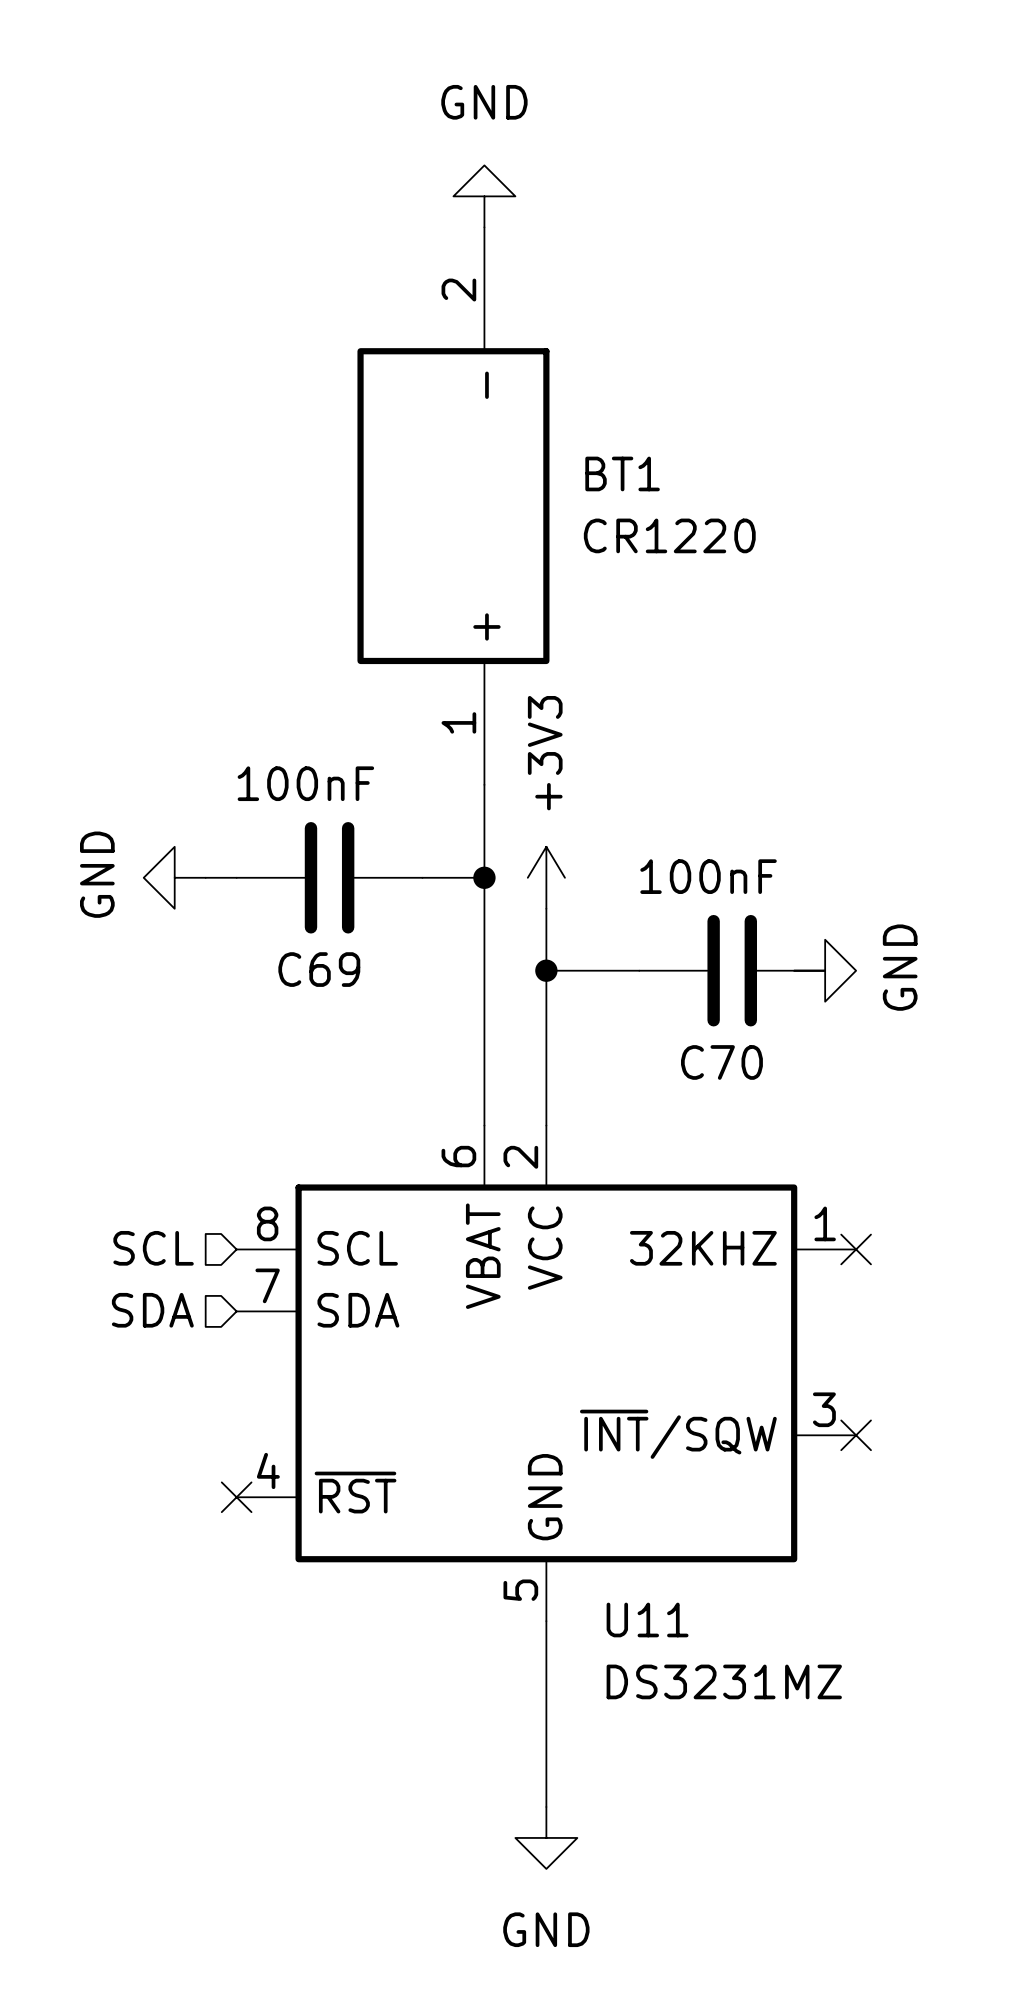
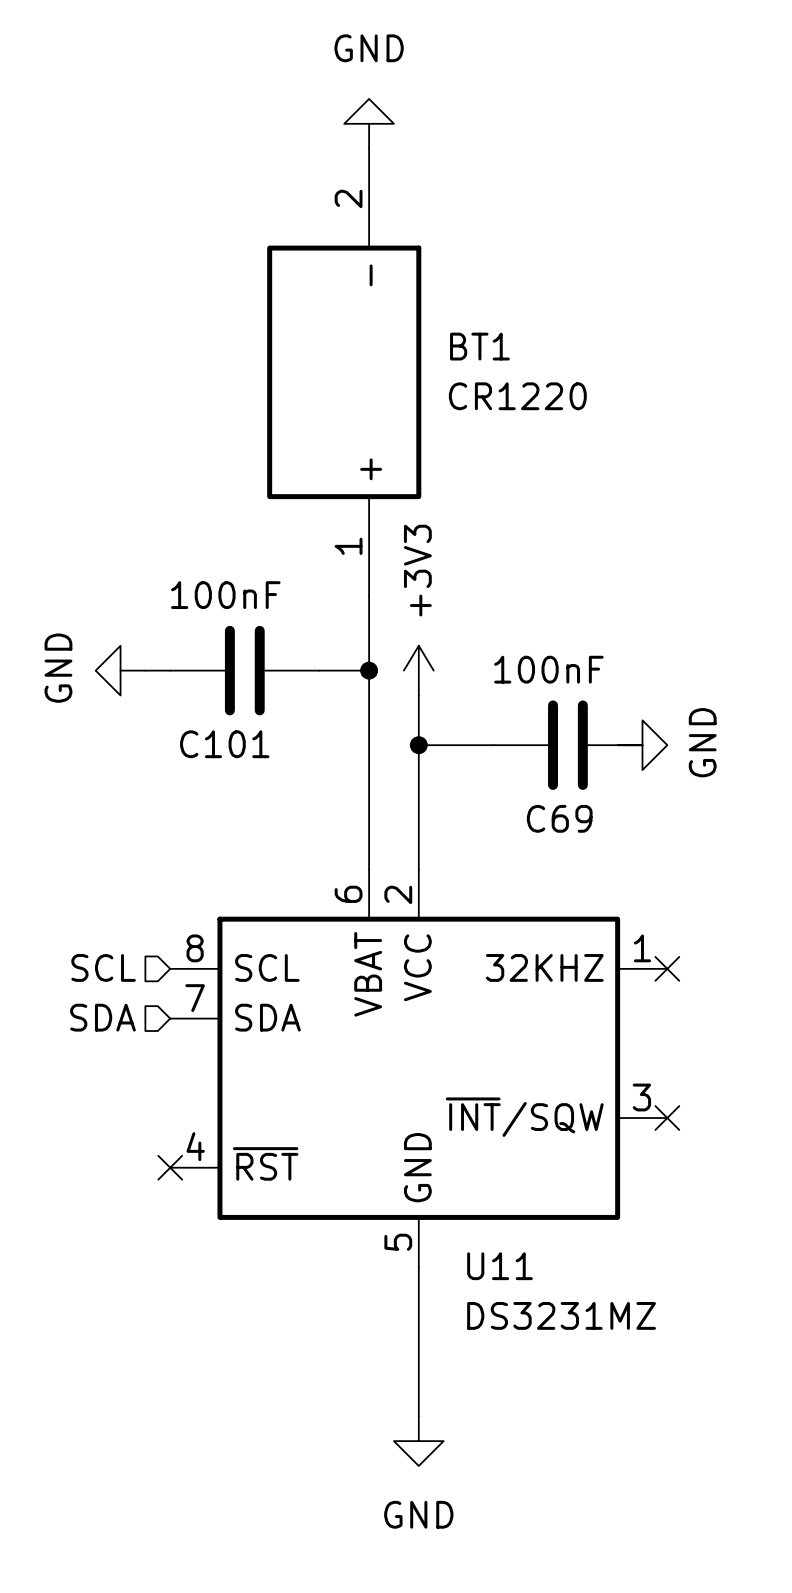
C69 name: C69 (319, 969) -> C101 (224, 744)
C70 name: C70 (721, 1062) -> C69 (559, 818)

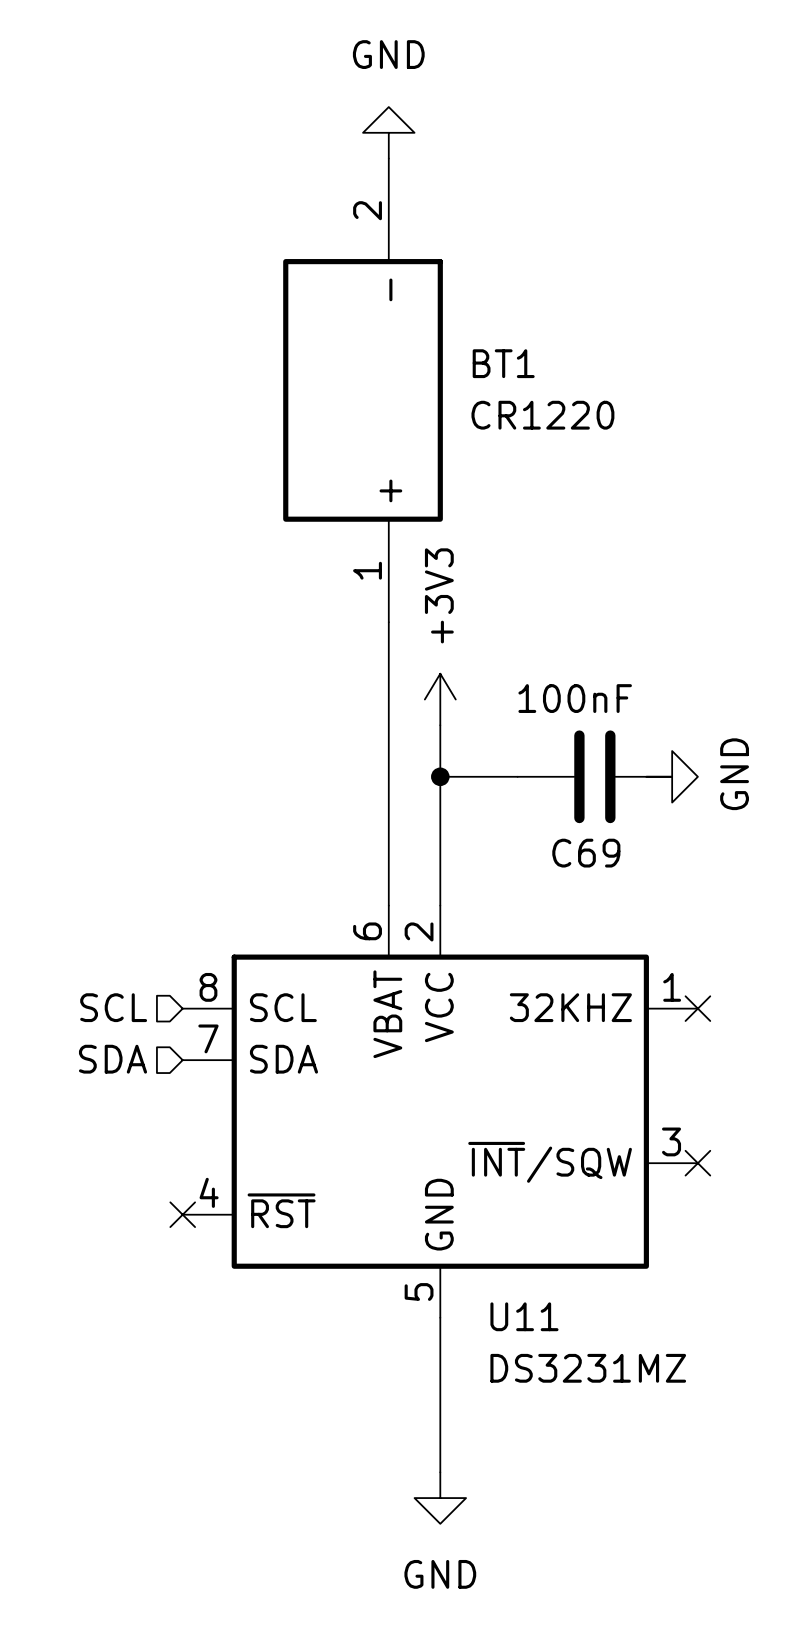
power symbol: GND (120, 670) -> none
wire: (145, 670) (170, 670) -> none
C101: 100nF (244, 670) -> none
wire: (319, 670) (369, 670) -> none
junction: (369, 670) -> none

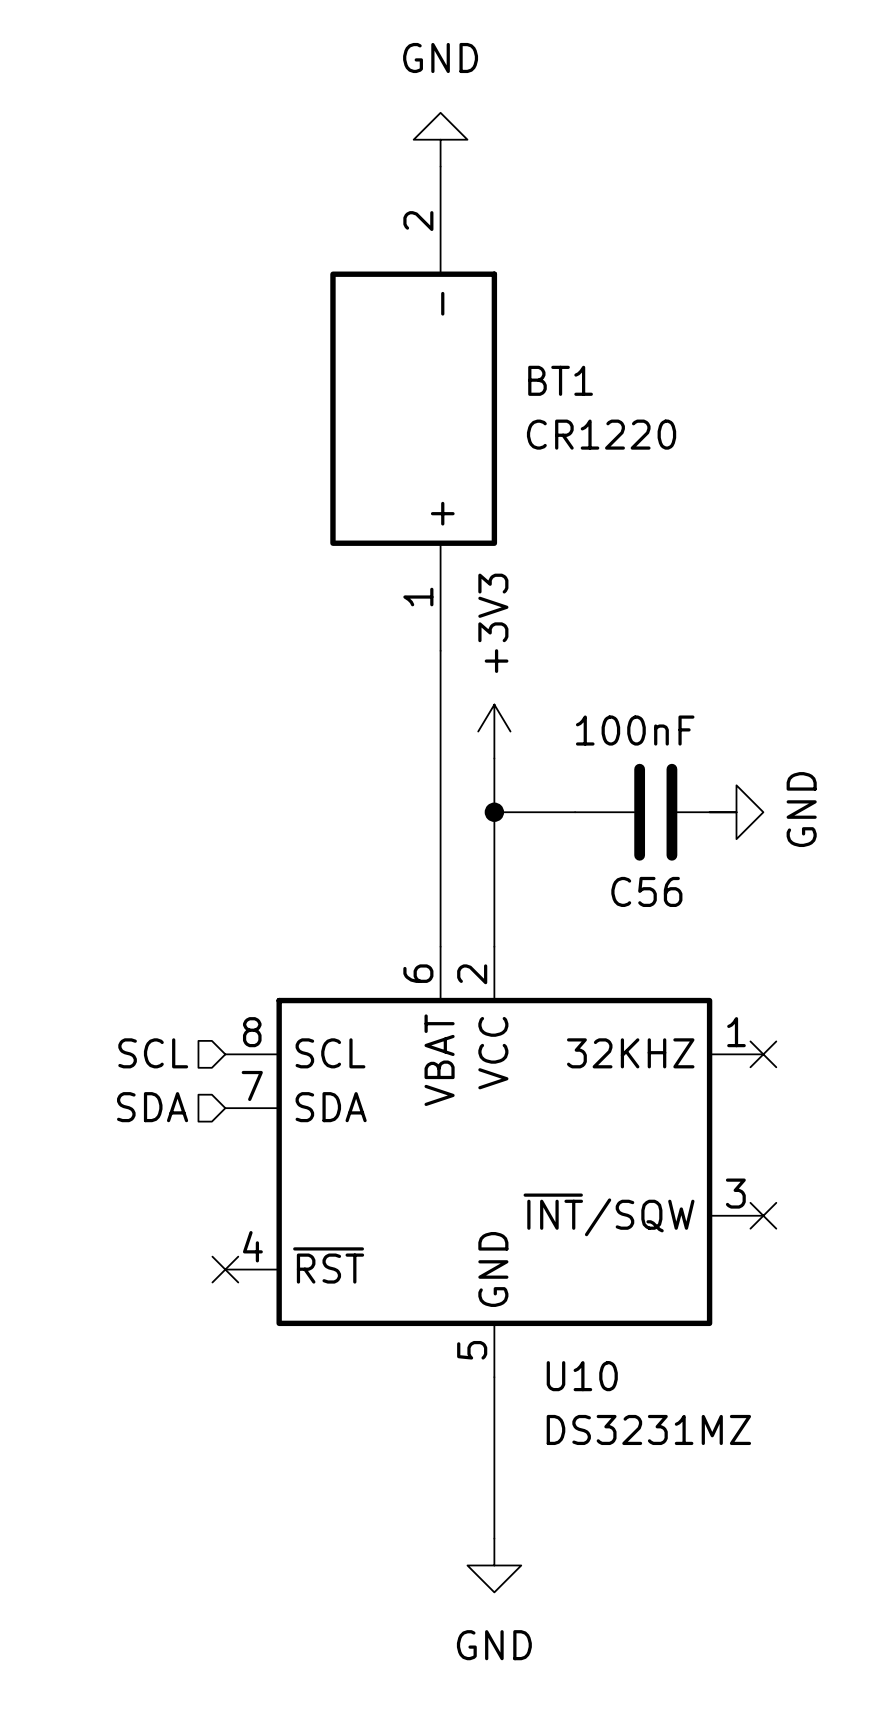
C69 name: C69 (586, 853) -> C56 (646, 891)
U11 name: U11 (524, 1316) -> U10 (582, 1376)

